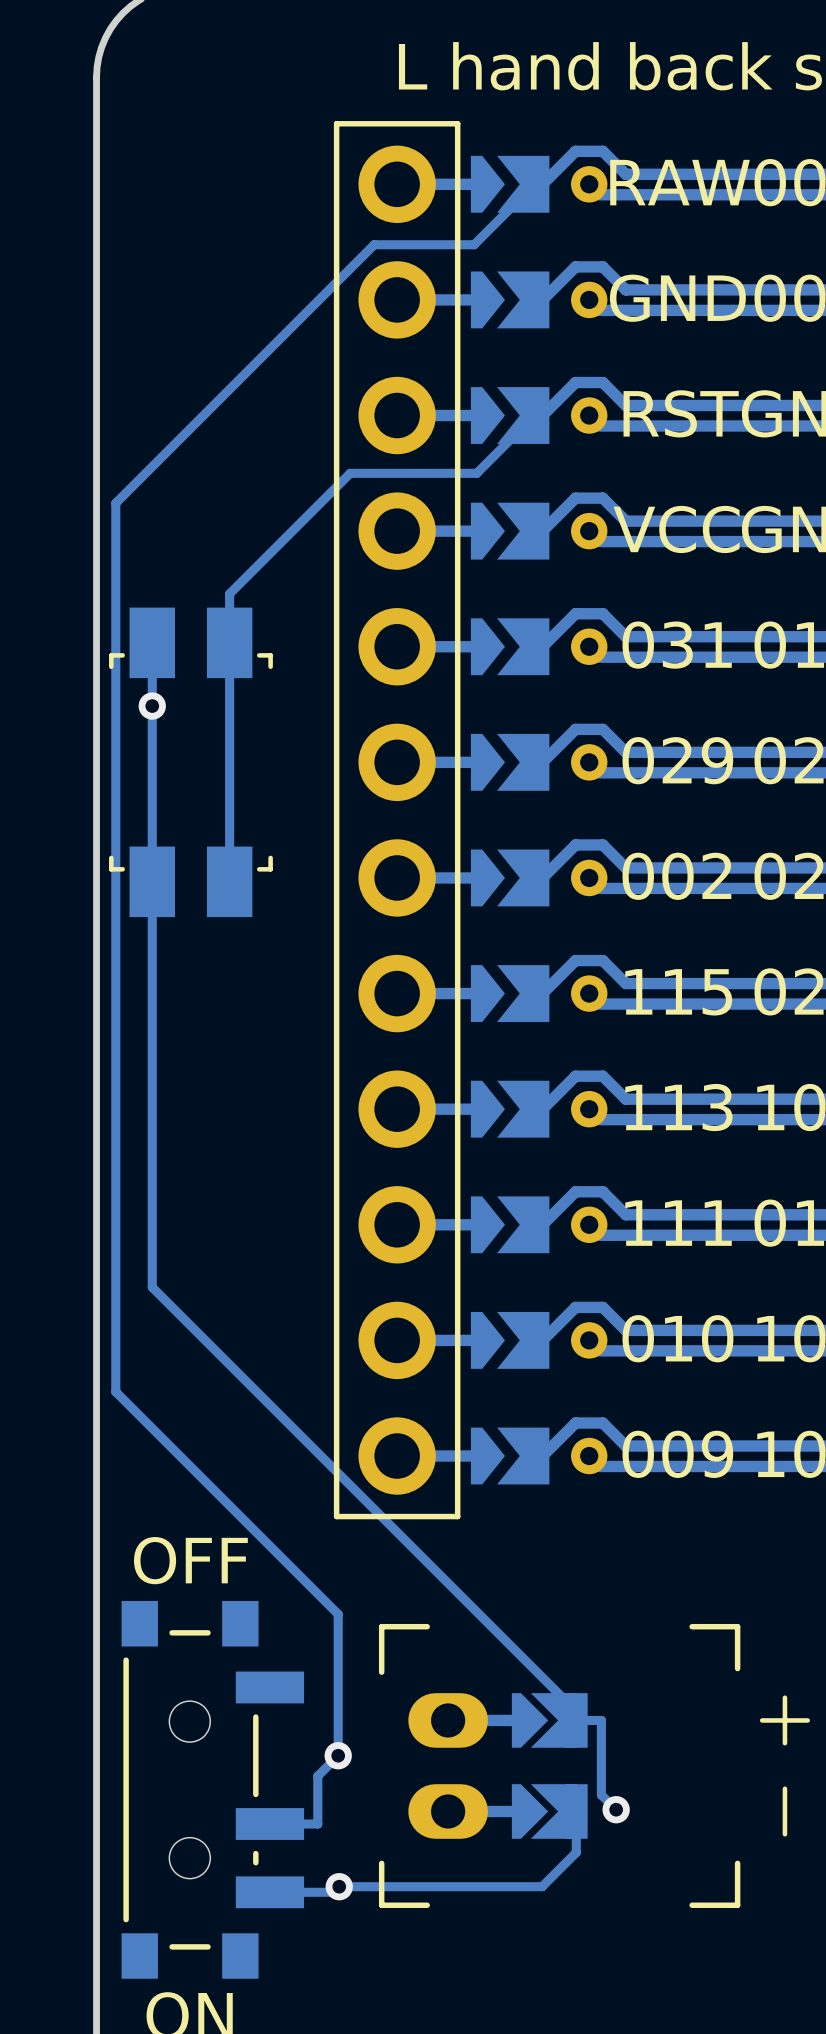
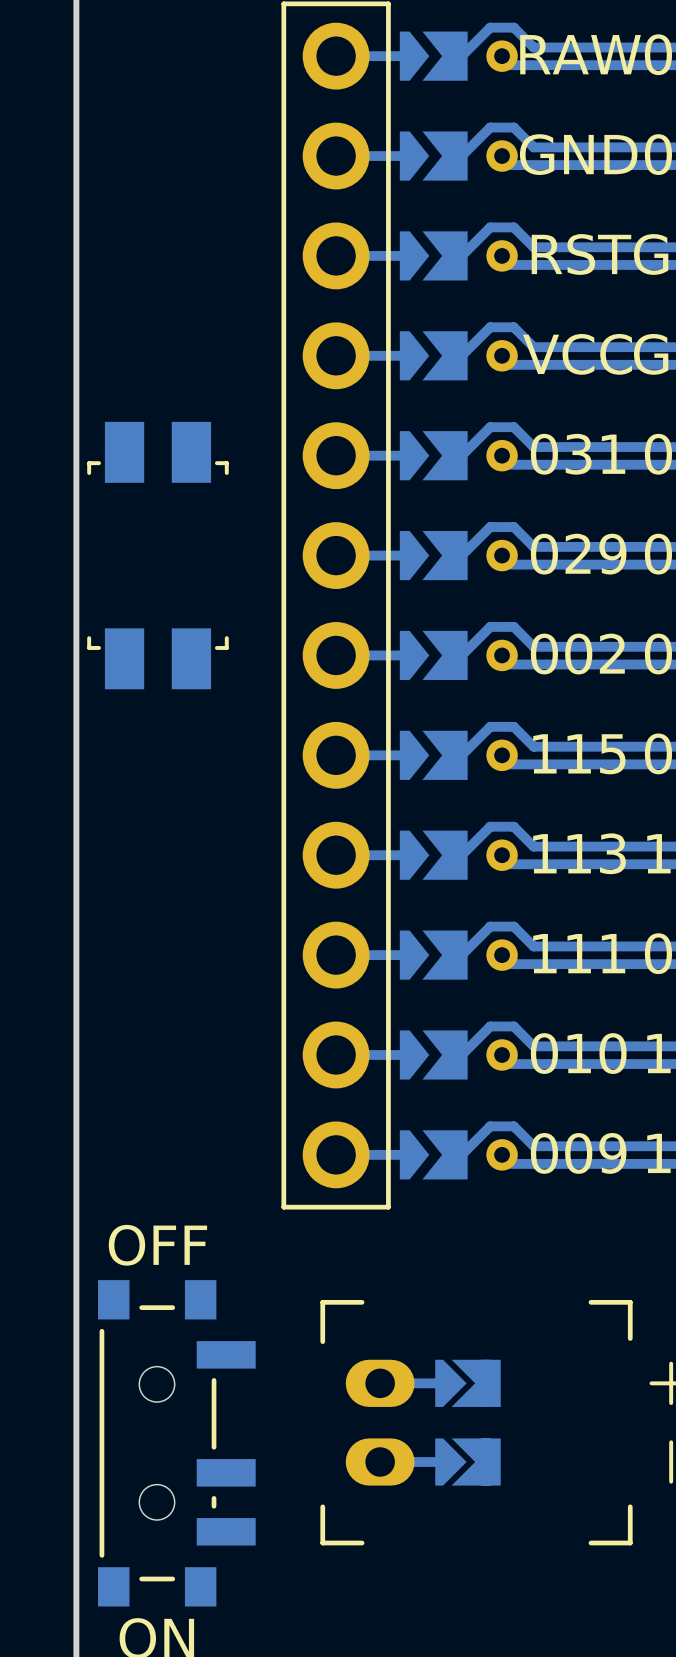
track: (534, 184) (474, 244) (374, 244) (115, 503) (115, 1391) (338, 1614) (338, 1755) (317, 1776) (317, 1824) (269, 1824) -> none
track: (534, 415) (476, 473) (350, 473) (229, 593) (229, 881) -> none
track: (152, 642) (152, 1287) (585, 1720) -> none
via: (152, 706) -> none
track: (576, 1720) (601, 1720) (601, 1794) (616, 1809) -> none
via: (338, 1755) -> none
via: (616, 1809) -> none
track: (576, 1811) (576, 1852) (542, 1886) (339, 1886) (333, 1892) (269, 1892) -> none
via: (339, 1886) -> none

